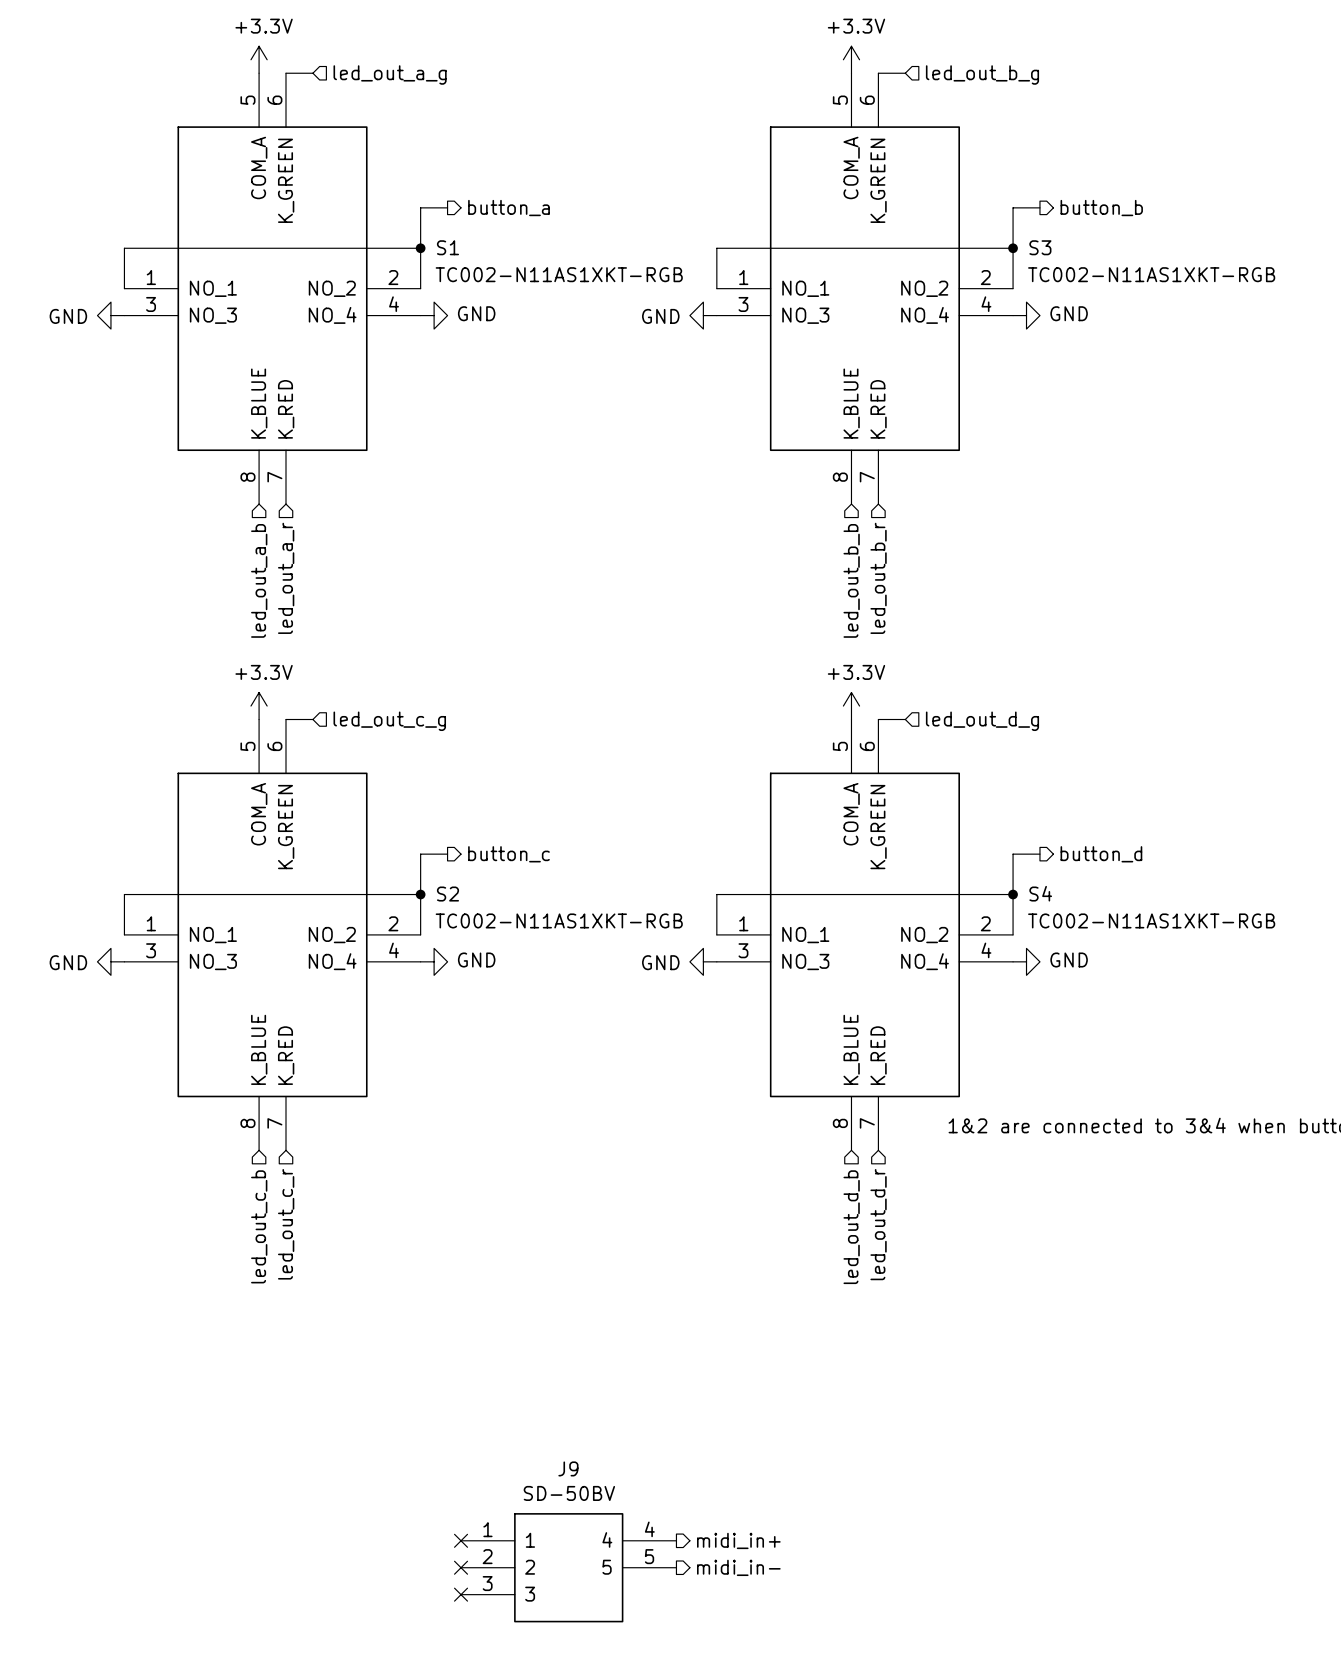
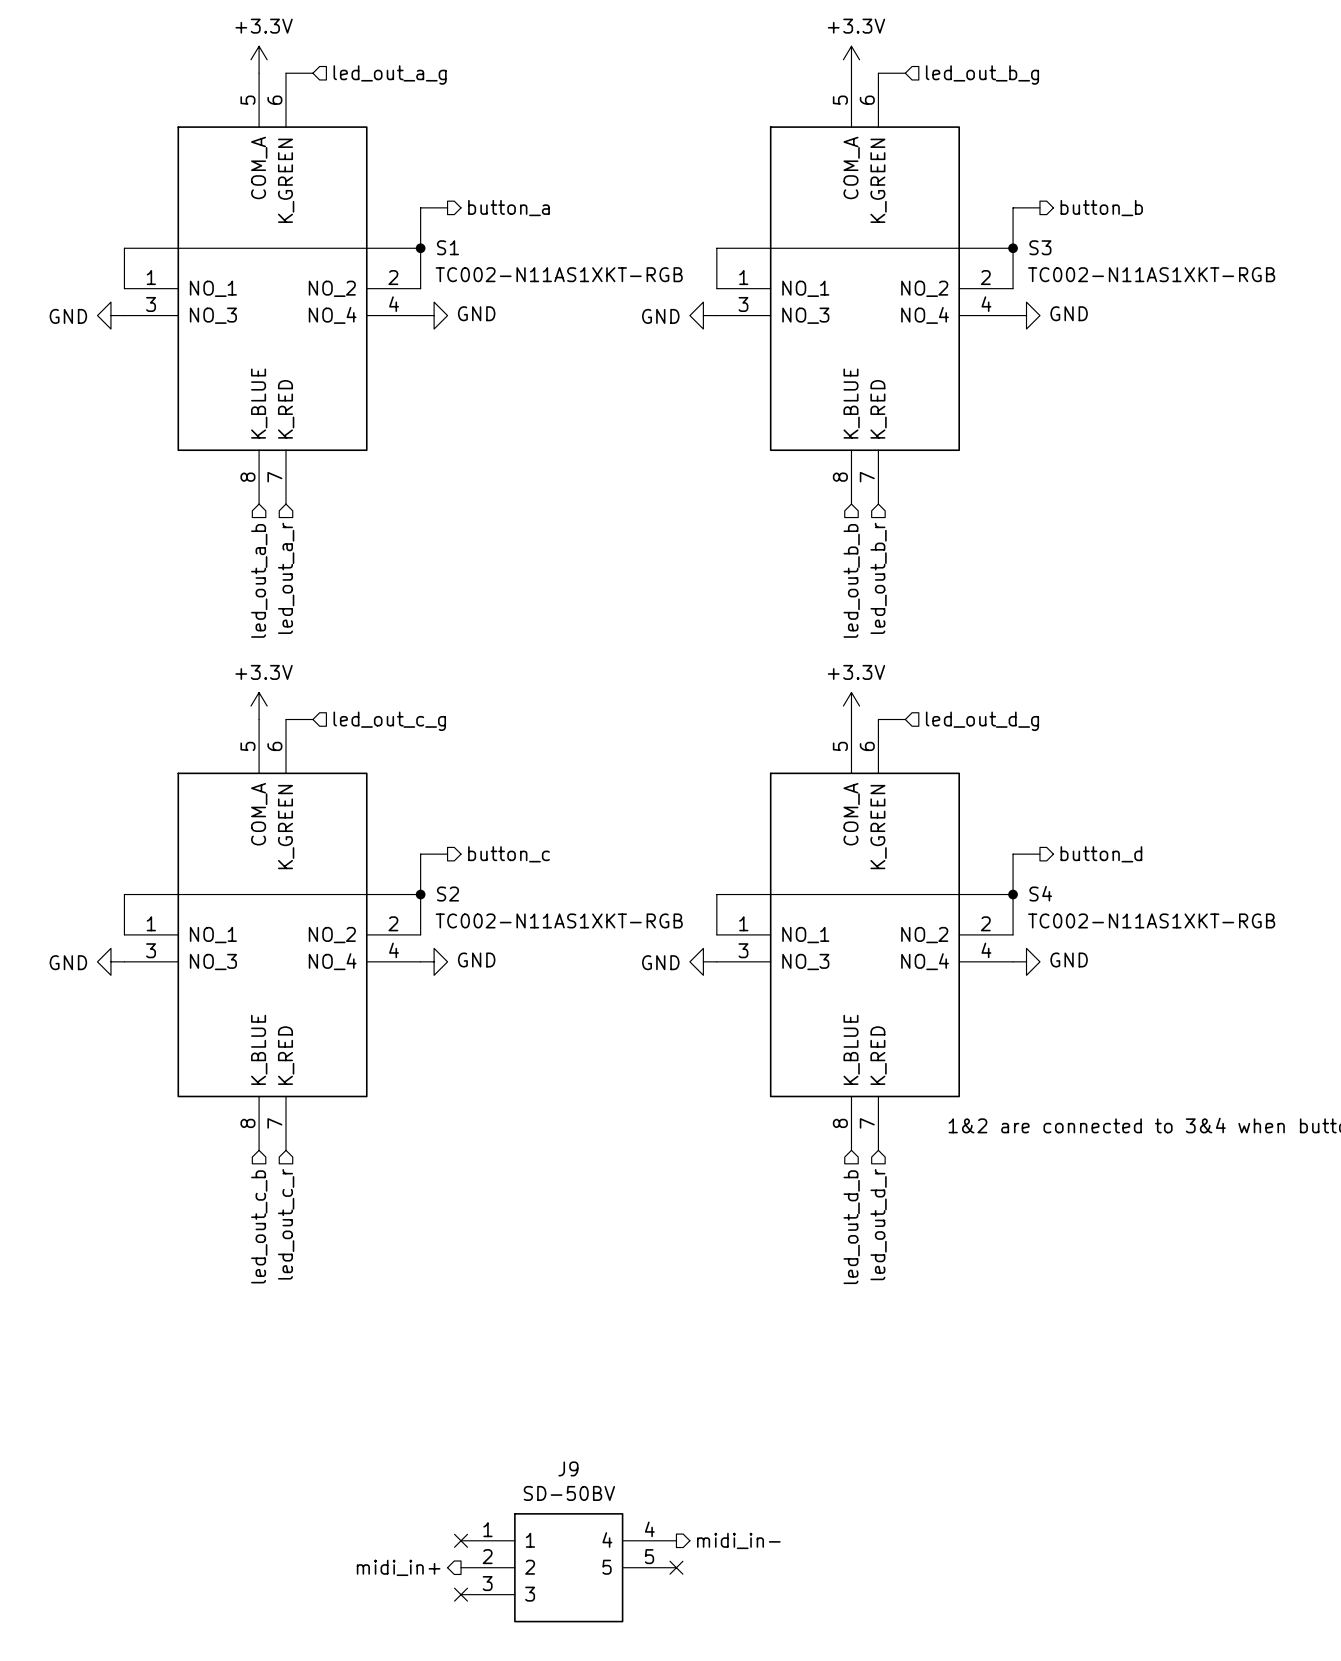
hierarchical label: midi_in+ (738, 1540) -> midi_in- (738, 1540)
hierarchical label: none -> midi_in+ (398, 1567)
no-connect mark: (461, 1567) -> none
no-connect mark: none -> (676, 1567)
hierarchical label: midi_in- (738, 1567) -> none

